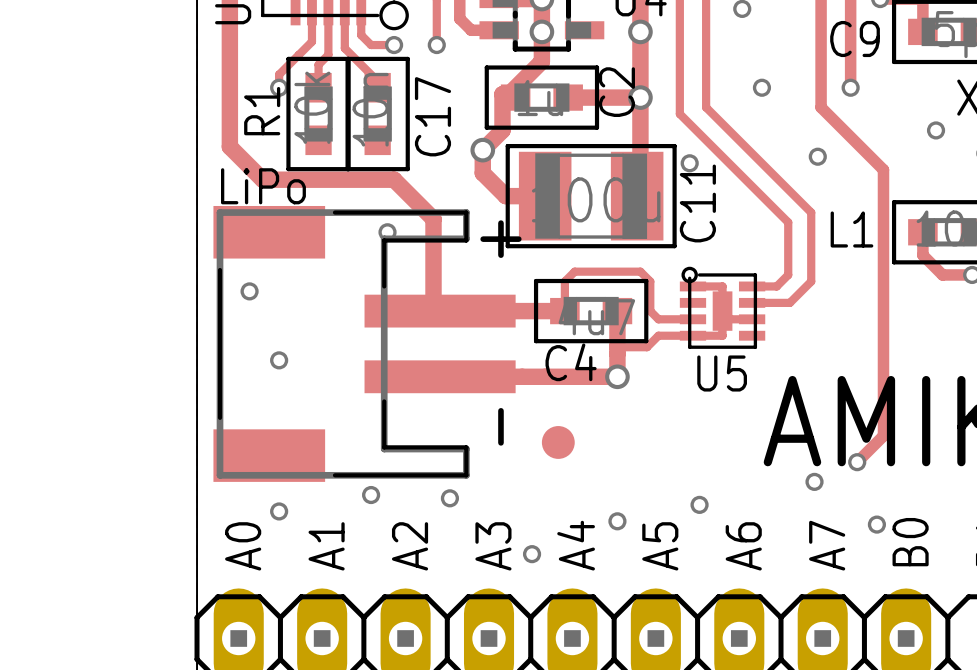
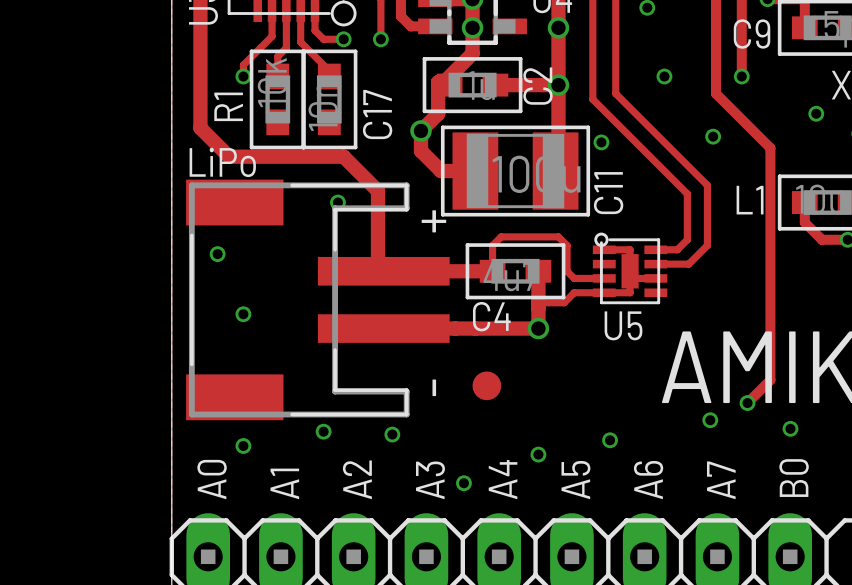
via position: (876, 524) -> (790, 428)

